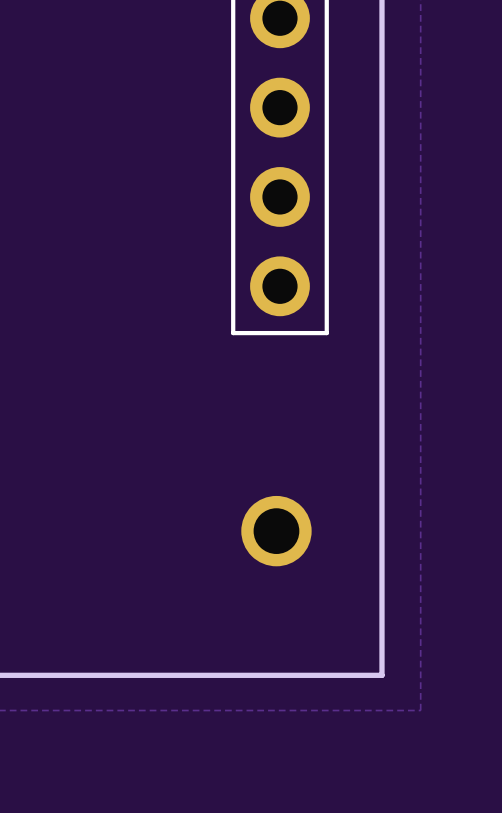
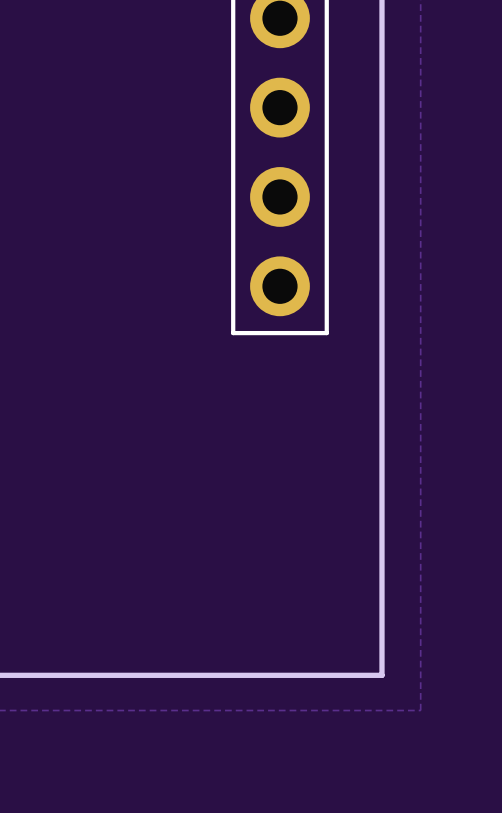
part: (276, 531) -> none

